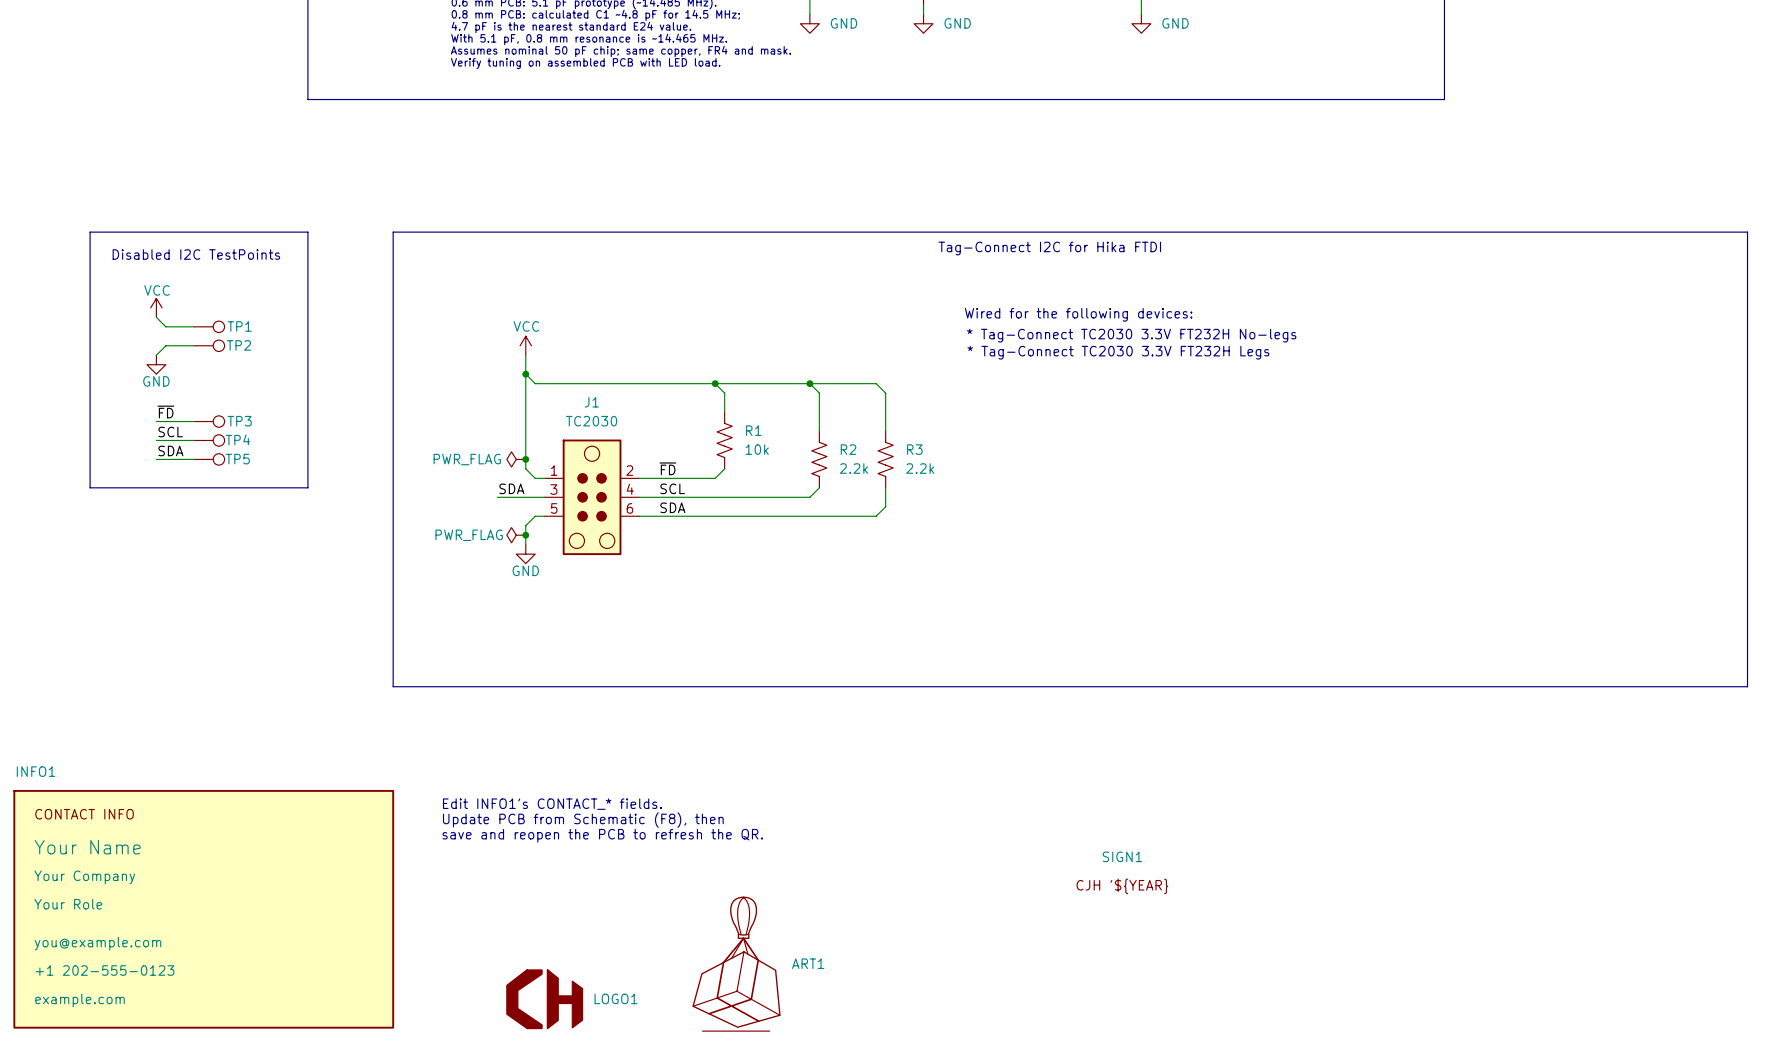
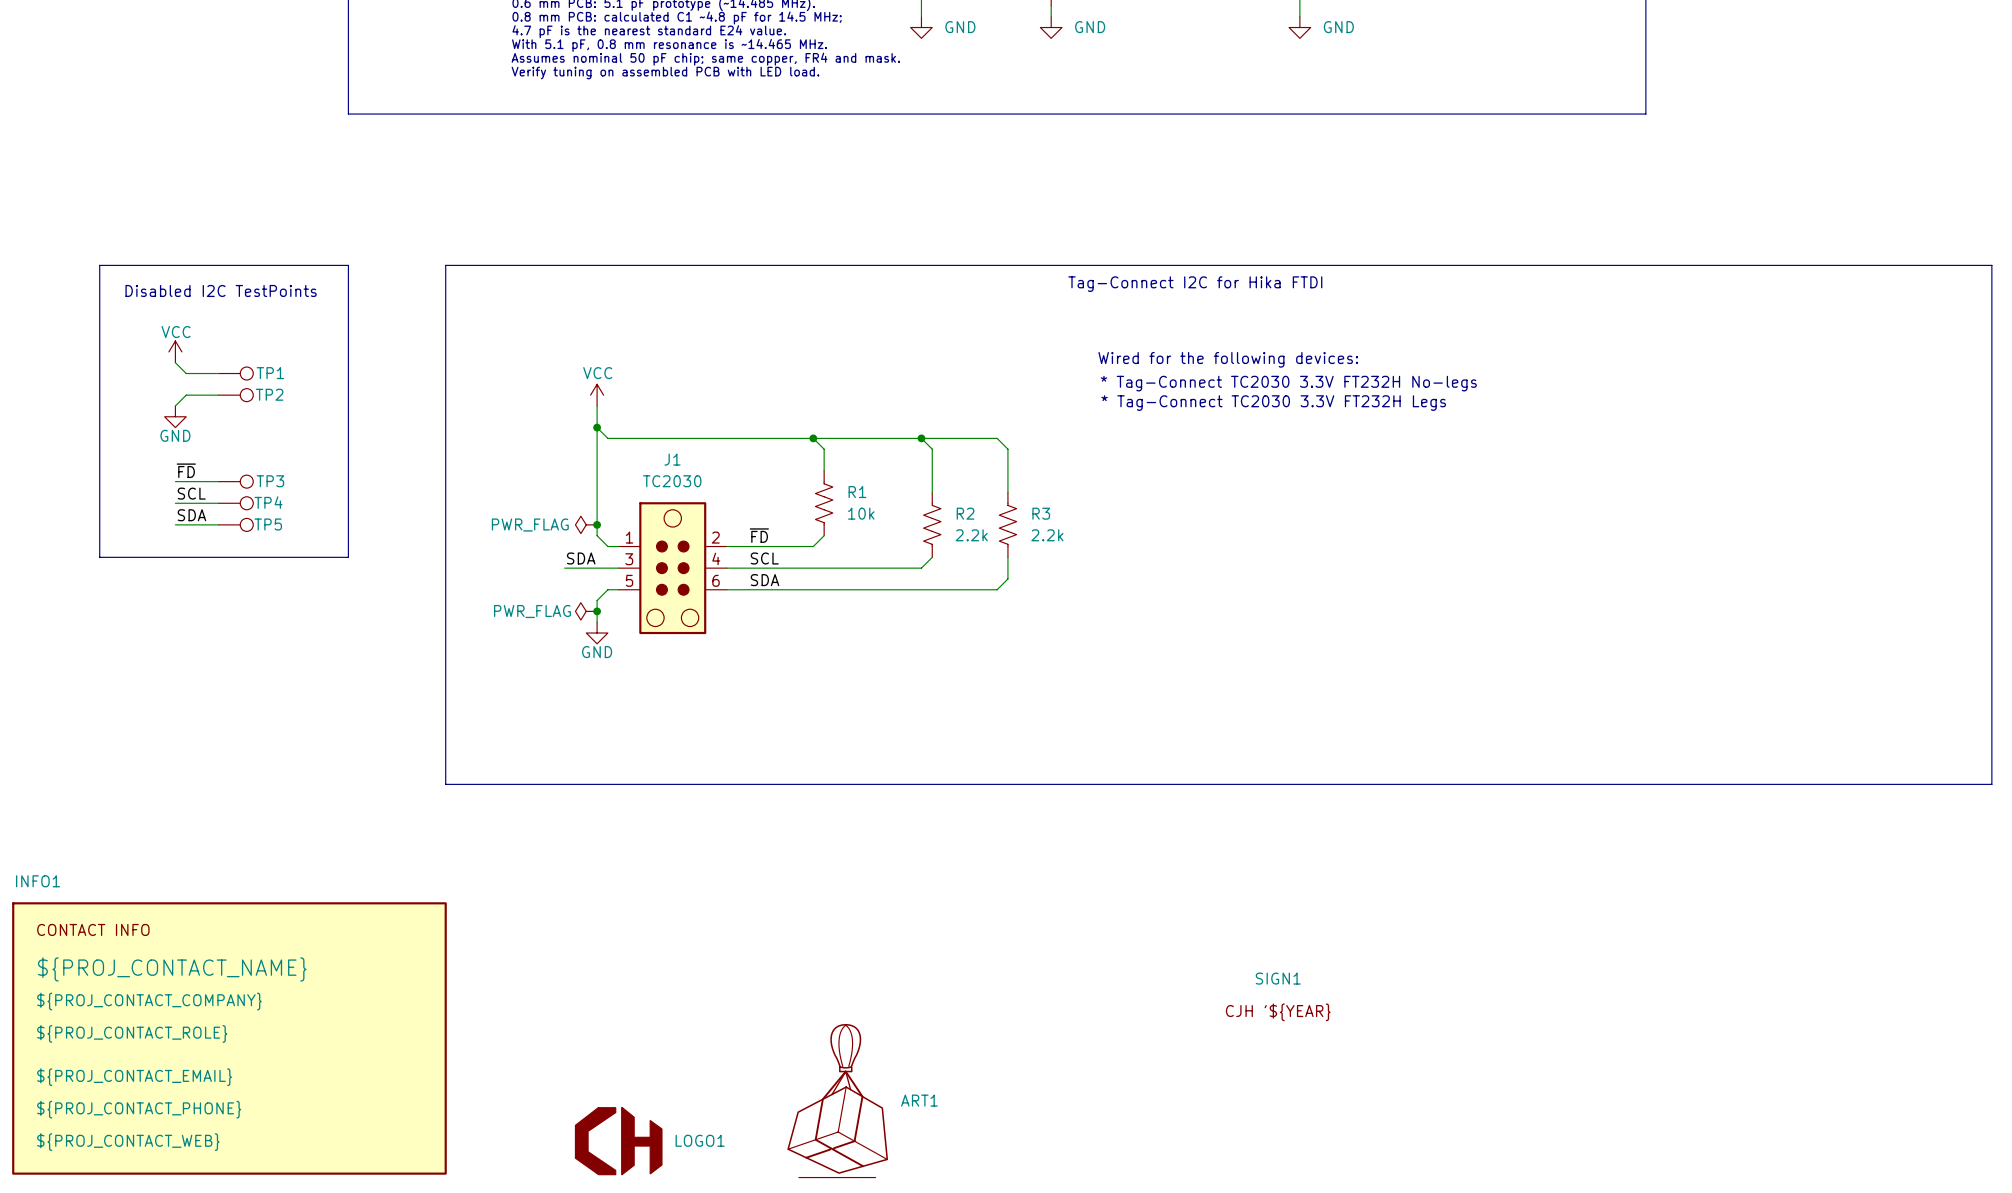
text: Edit INFO1's CONTACT_* fields. (552, 804) -> none
text: Update PCB from Schematic (F8), then (583, 820) -> none
text: save and reopen the PCB to refresh the QR. (602, 835) -> none
INFO1 text: Your Name (87, 847) -> ${PROJ_CONTACT_NAME} (172, 969)
INFO1 text: Your Company (84, 877) -> ${PROJ_CONTACT_COMPANY} (149, 1001)
INFO1 text: Your Role (68, 904) -> ${PROJ_CONTACT_ROLE} (132, 1033)
INFO1 text: you@example.com (98, 943) -> ${PROJ_CONTACT_EMAIL} (134, 1077)
INFO1 text: +1 202-555-0123 (105, 970) -> ${PROJ_CONTACT_PHONE} (139, 1109)
INFO1 text: example.com (80, 1000) -> ${PROJ_CONTACT_WEB} (128, 1142)

